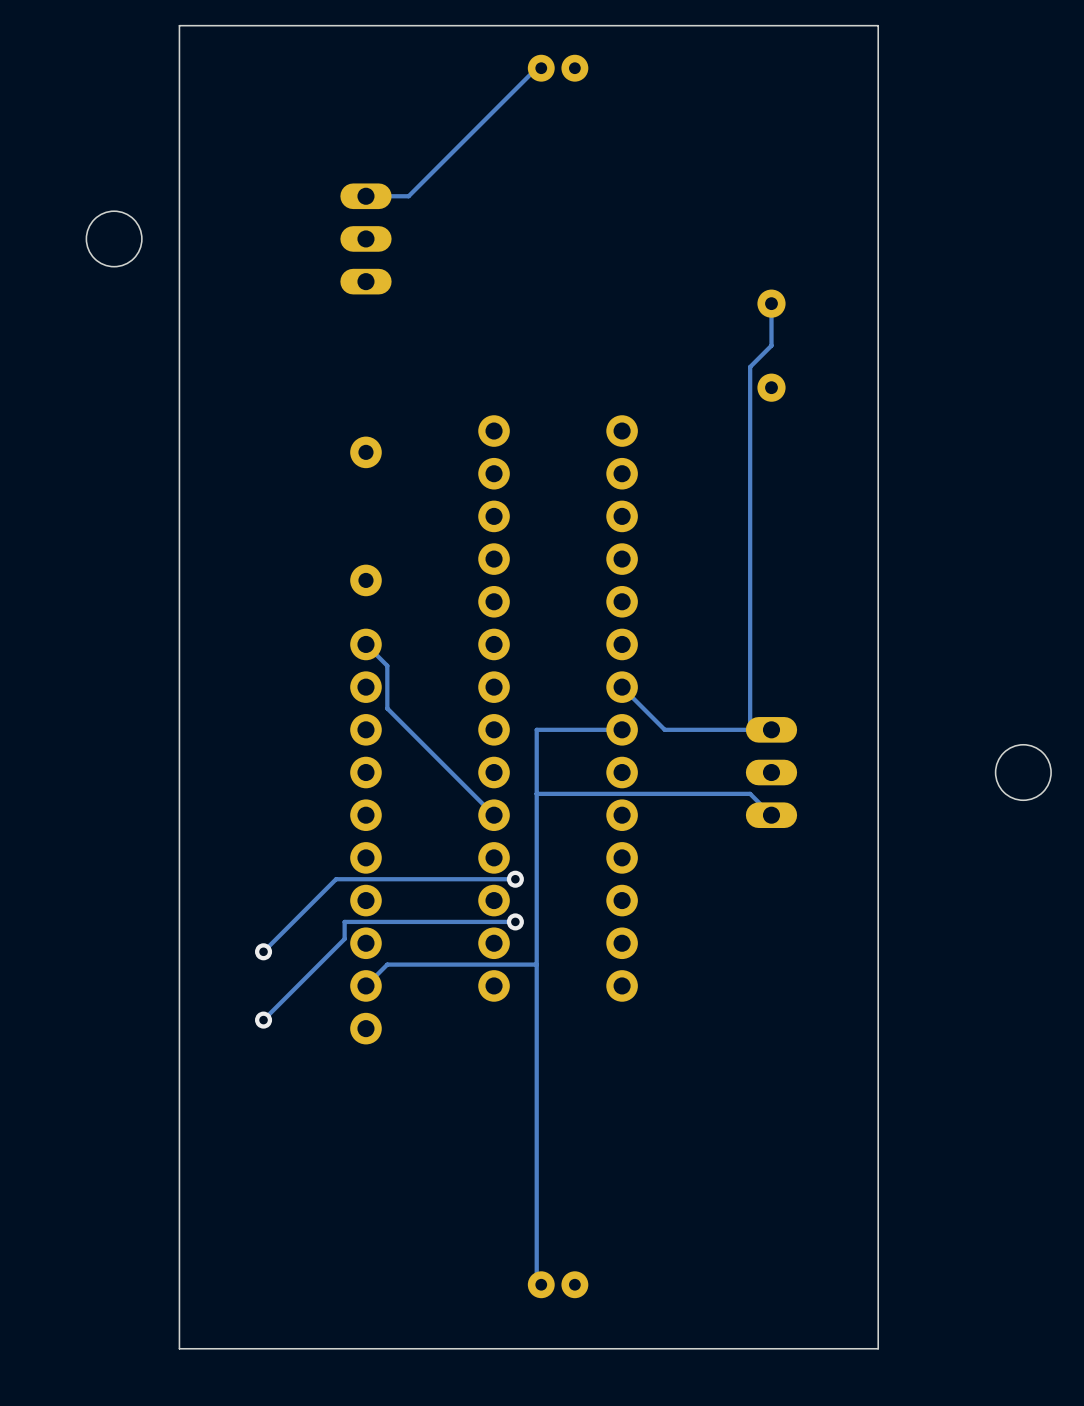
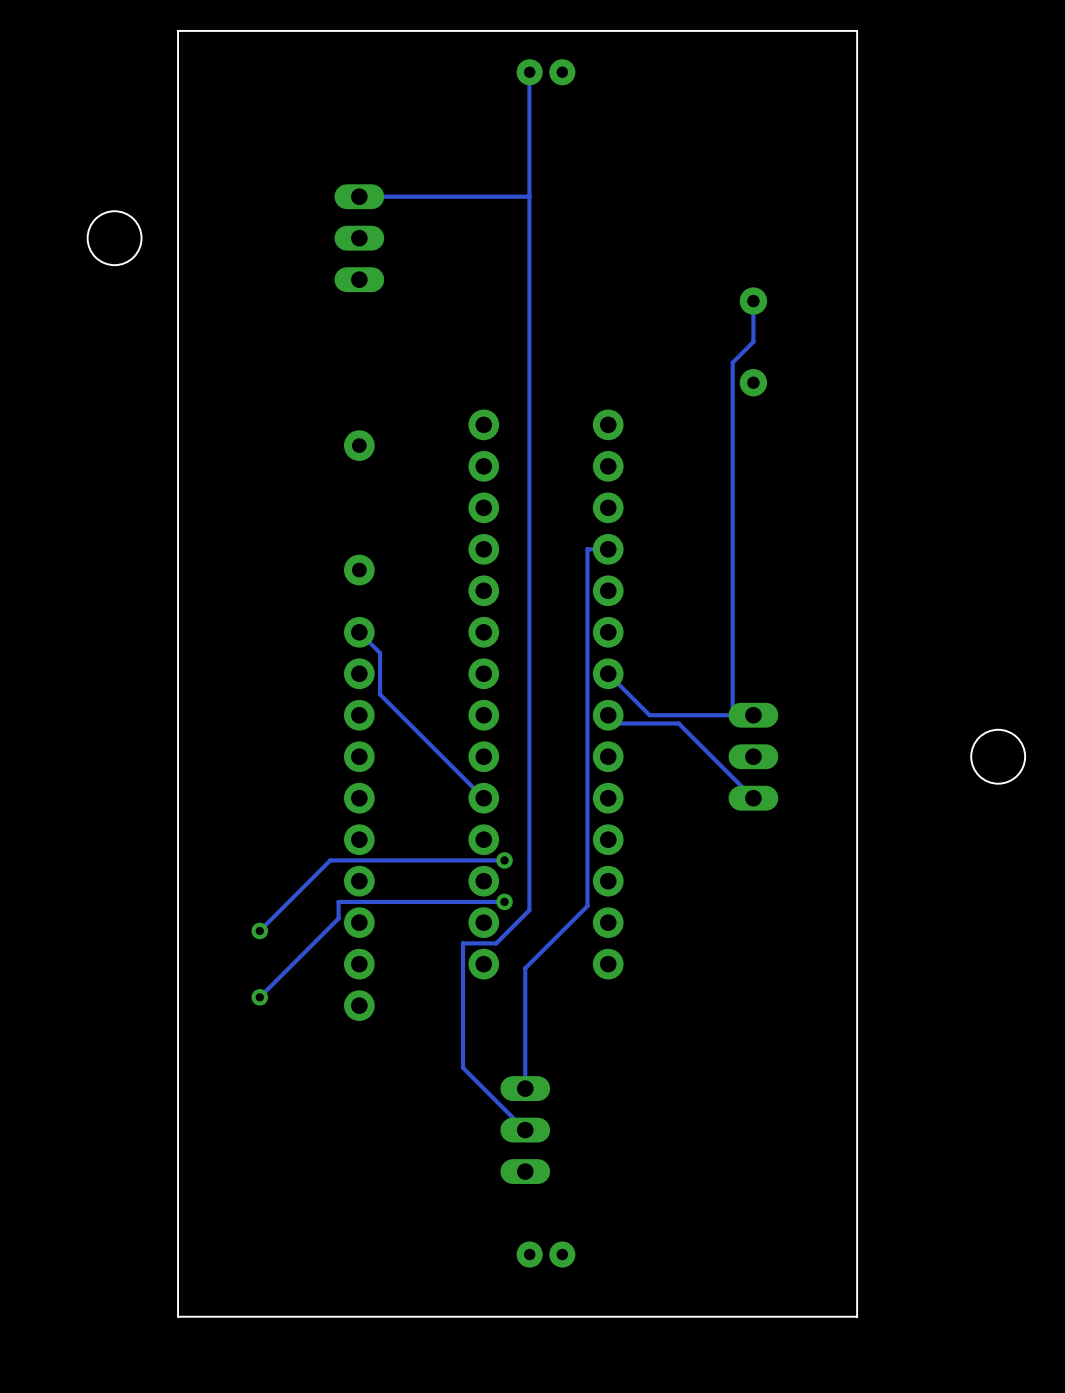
track: (540, 68) (536, 68) (408, 196) -> (529, 196) (400, 196)
track: (622, 729) (536, 729) (536, 990) -> (608, 549) (587, 549) (587, 906) (525, 968)
track: (750, 793) (536, 793) -> (732, 777) (678, 723) (616, 723) (608, 715)
track: (472, 964) (387, 964) (365, 985) -> (463, 943) (463, 1067) (525, 1130)
track: (536, 964) (506, 964) -> (529, 72) (529, 910) (496, 943)
track: (536, 1114) (536, 1284) (541, 1284) -> none
part: none -> (525, 1130)

